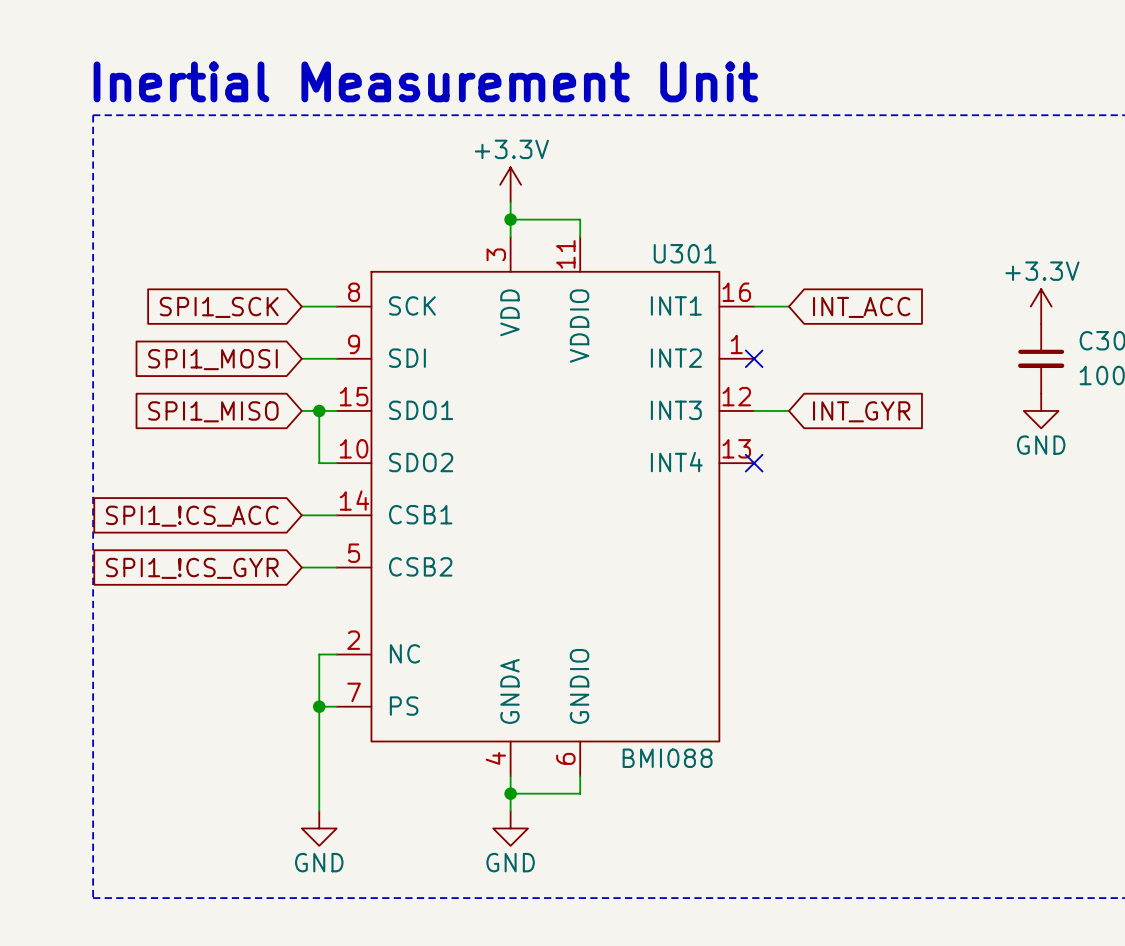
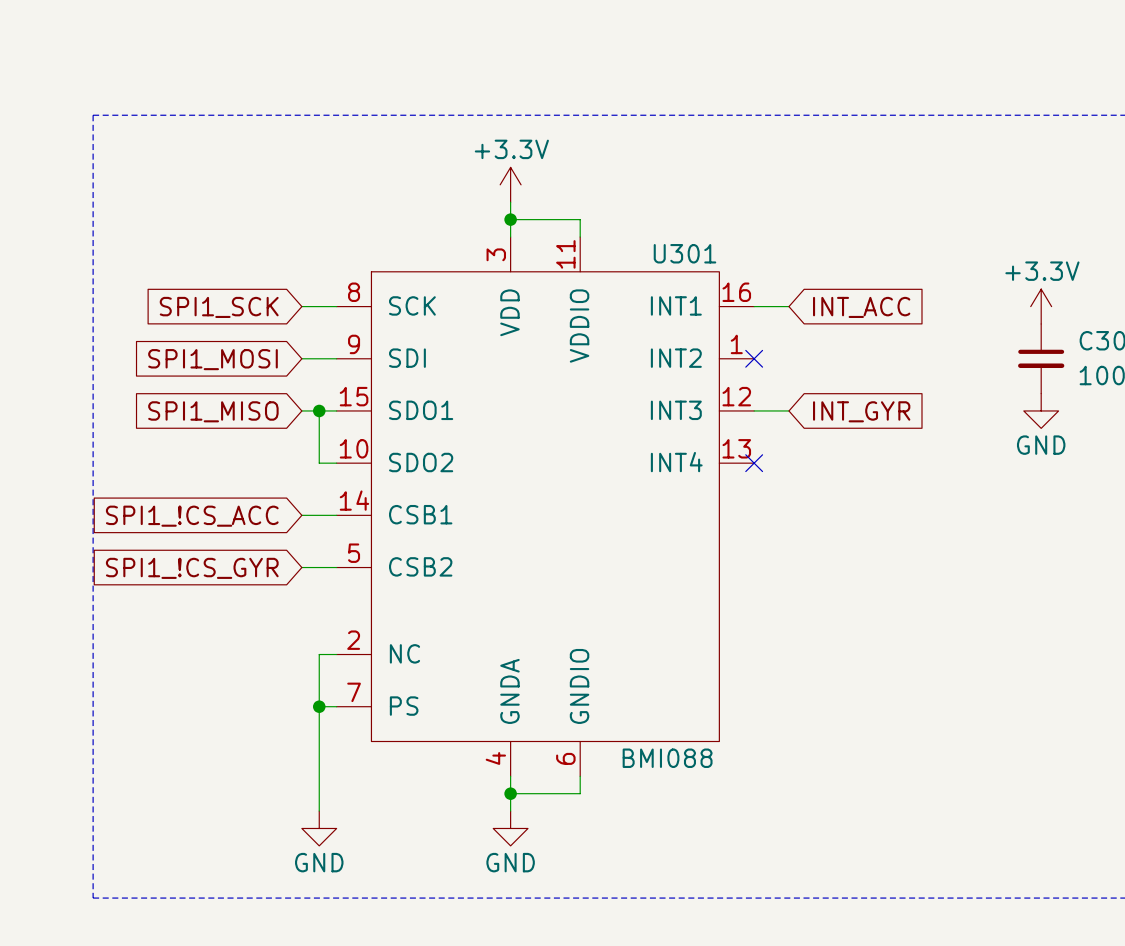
text: Inertial Measurement Unit (425, 81) -> none

